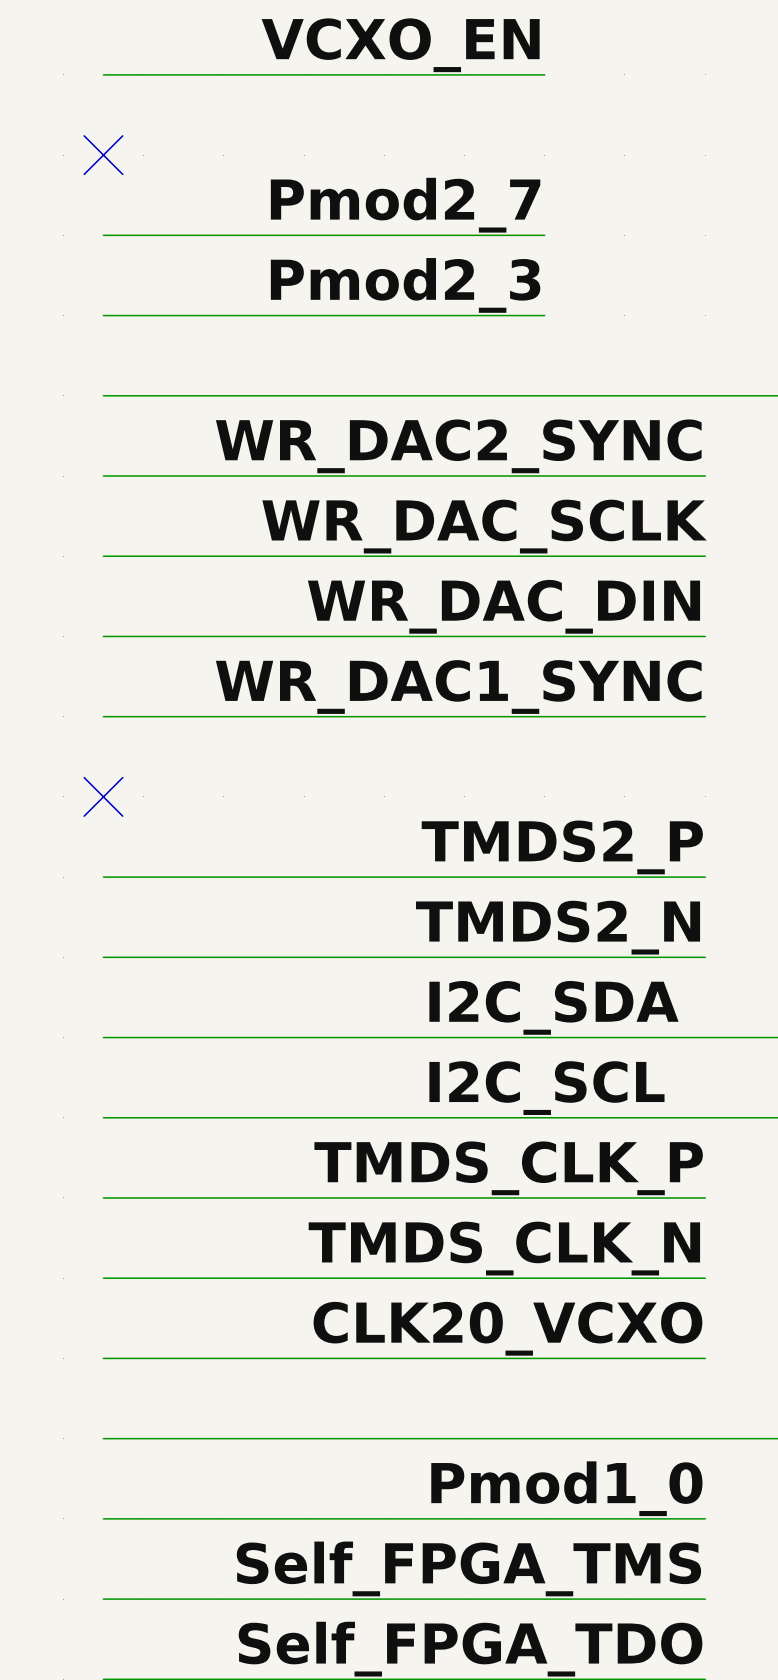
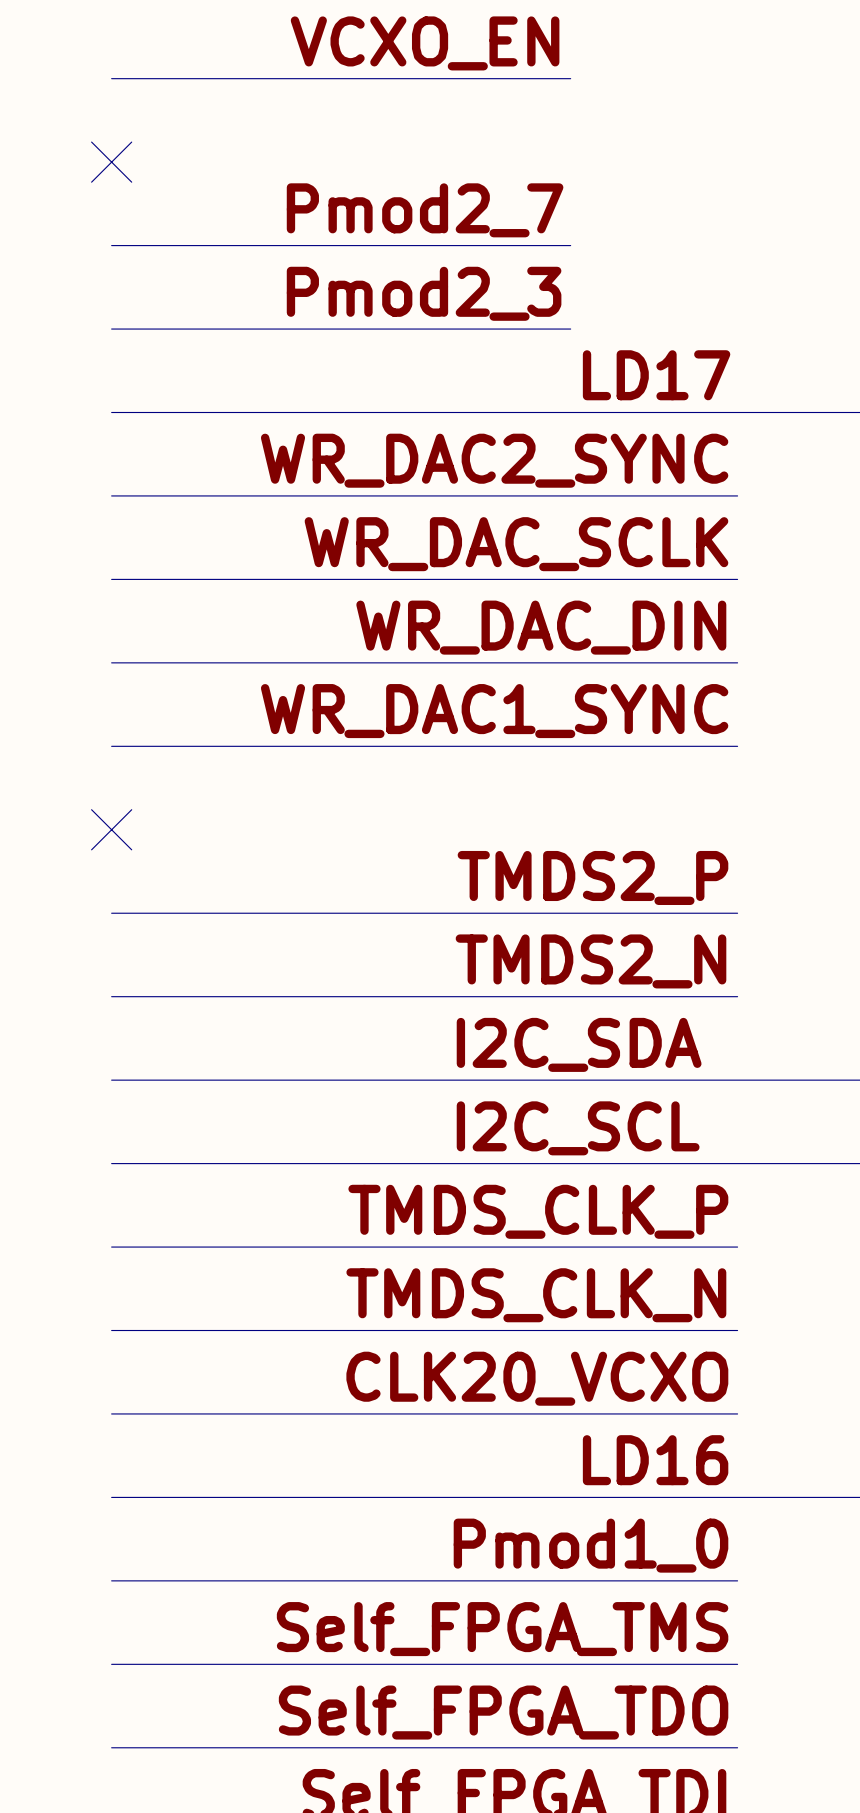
label: none -> LD17 (656, 375)
label: none -> LD16 (655, 1460)

